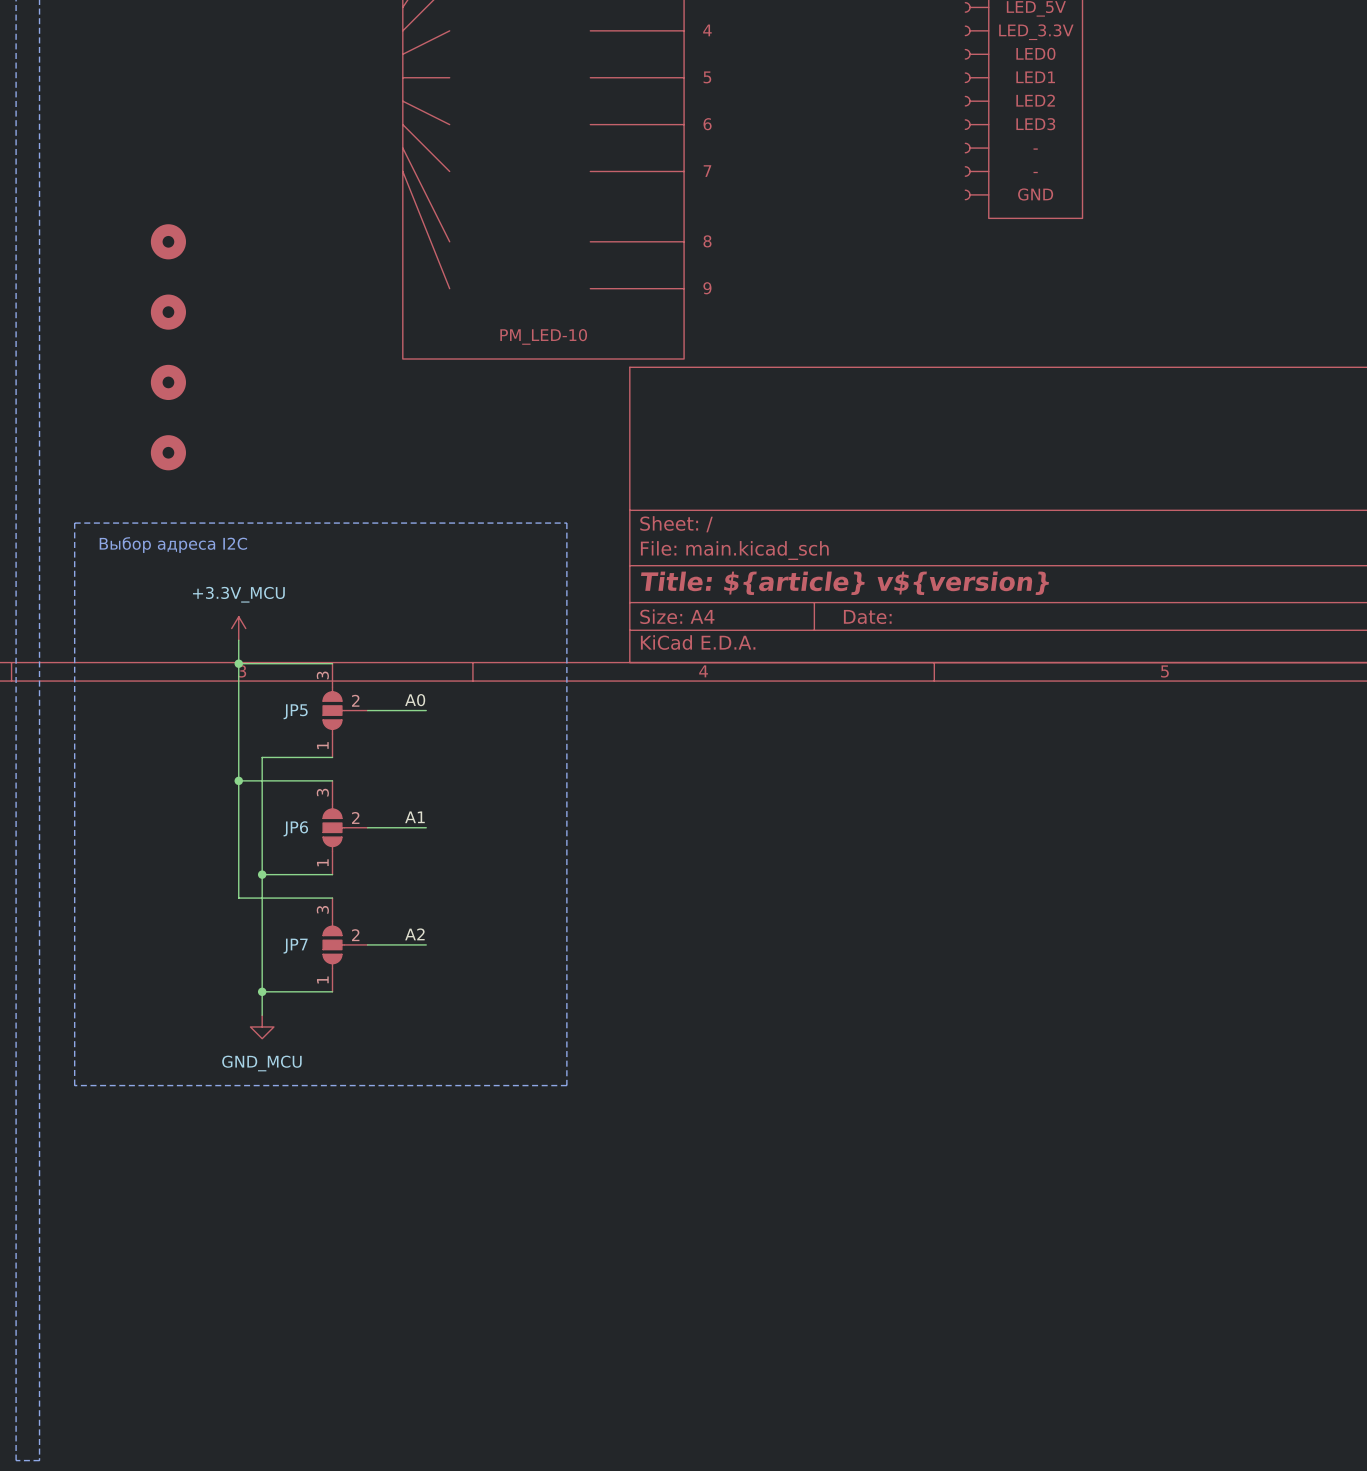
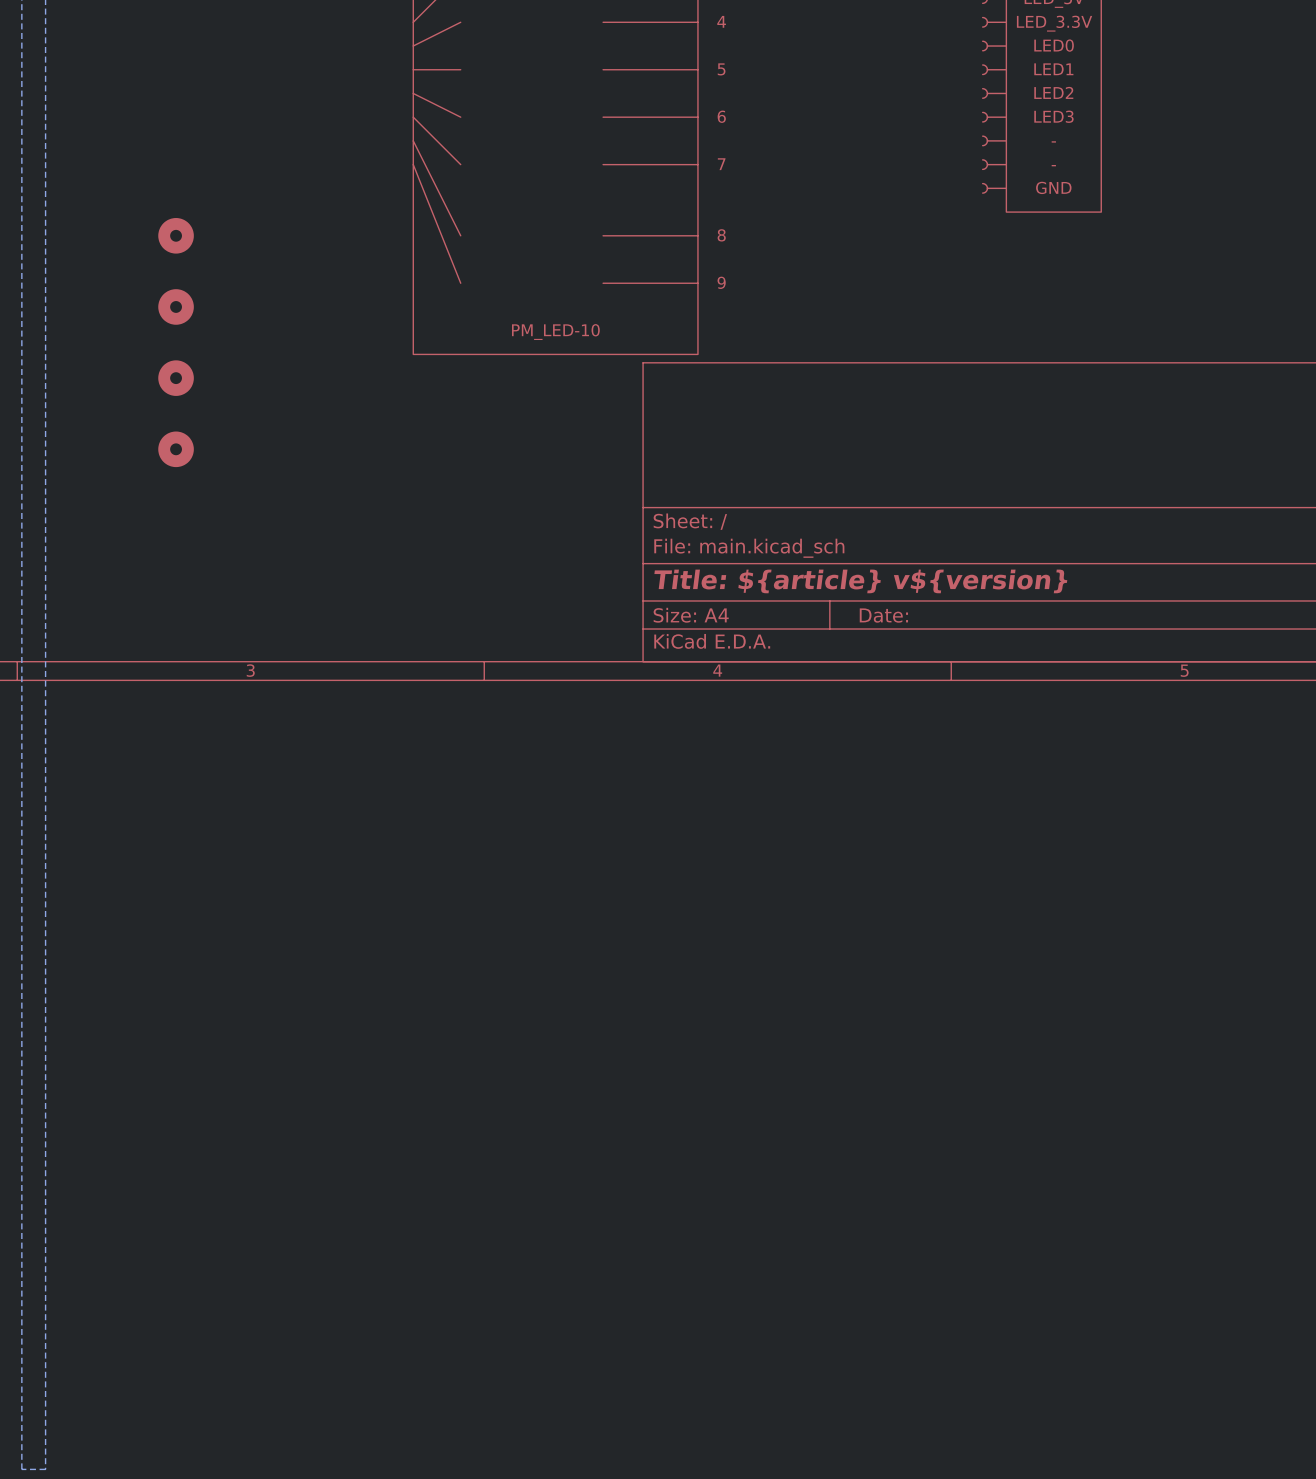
line: (74, 523) (566, 523) (566, 1085) (74, 1085) (74, 523) -> none
text: Выбор адреса I2C (173, 545) -> none
power symbol: +3.3V_MCU (238, 628) -> none
wire: (238, 640) (238, 898) (332, 898) -> none
wire: (238, 663) (332, 663) -> none
junction: (238, 663) -> none
label: A0 (415, 700) -> none
JP5: (345, 710) -> none
wire: (367, 710) (426, 710) -> none
wire: (332, 757) (262, 757) (262, 1015) -> none
wire: (238, 780) (332, 780) -> none
junction: (238, 780) -> none
label: A1 (414, 817) -> none
JP6: (345, 827) -> none
wire: (367, 827) (426, 827) -> none
wire: (262, 874) (332, 874) -> none
junction: (262, 874) -> none
label: A2 (414, 934) -> none
JP7: (345, 944) -> none
wire: (367, 944) (426, 944) -> none
wire: (262, 991) (332, 991) -> none
junction: (262, 991) -> none
power symbol: GND_MCU (262, 1026) -> none

